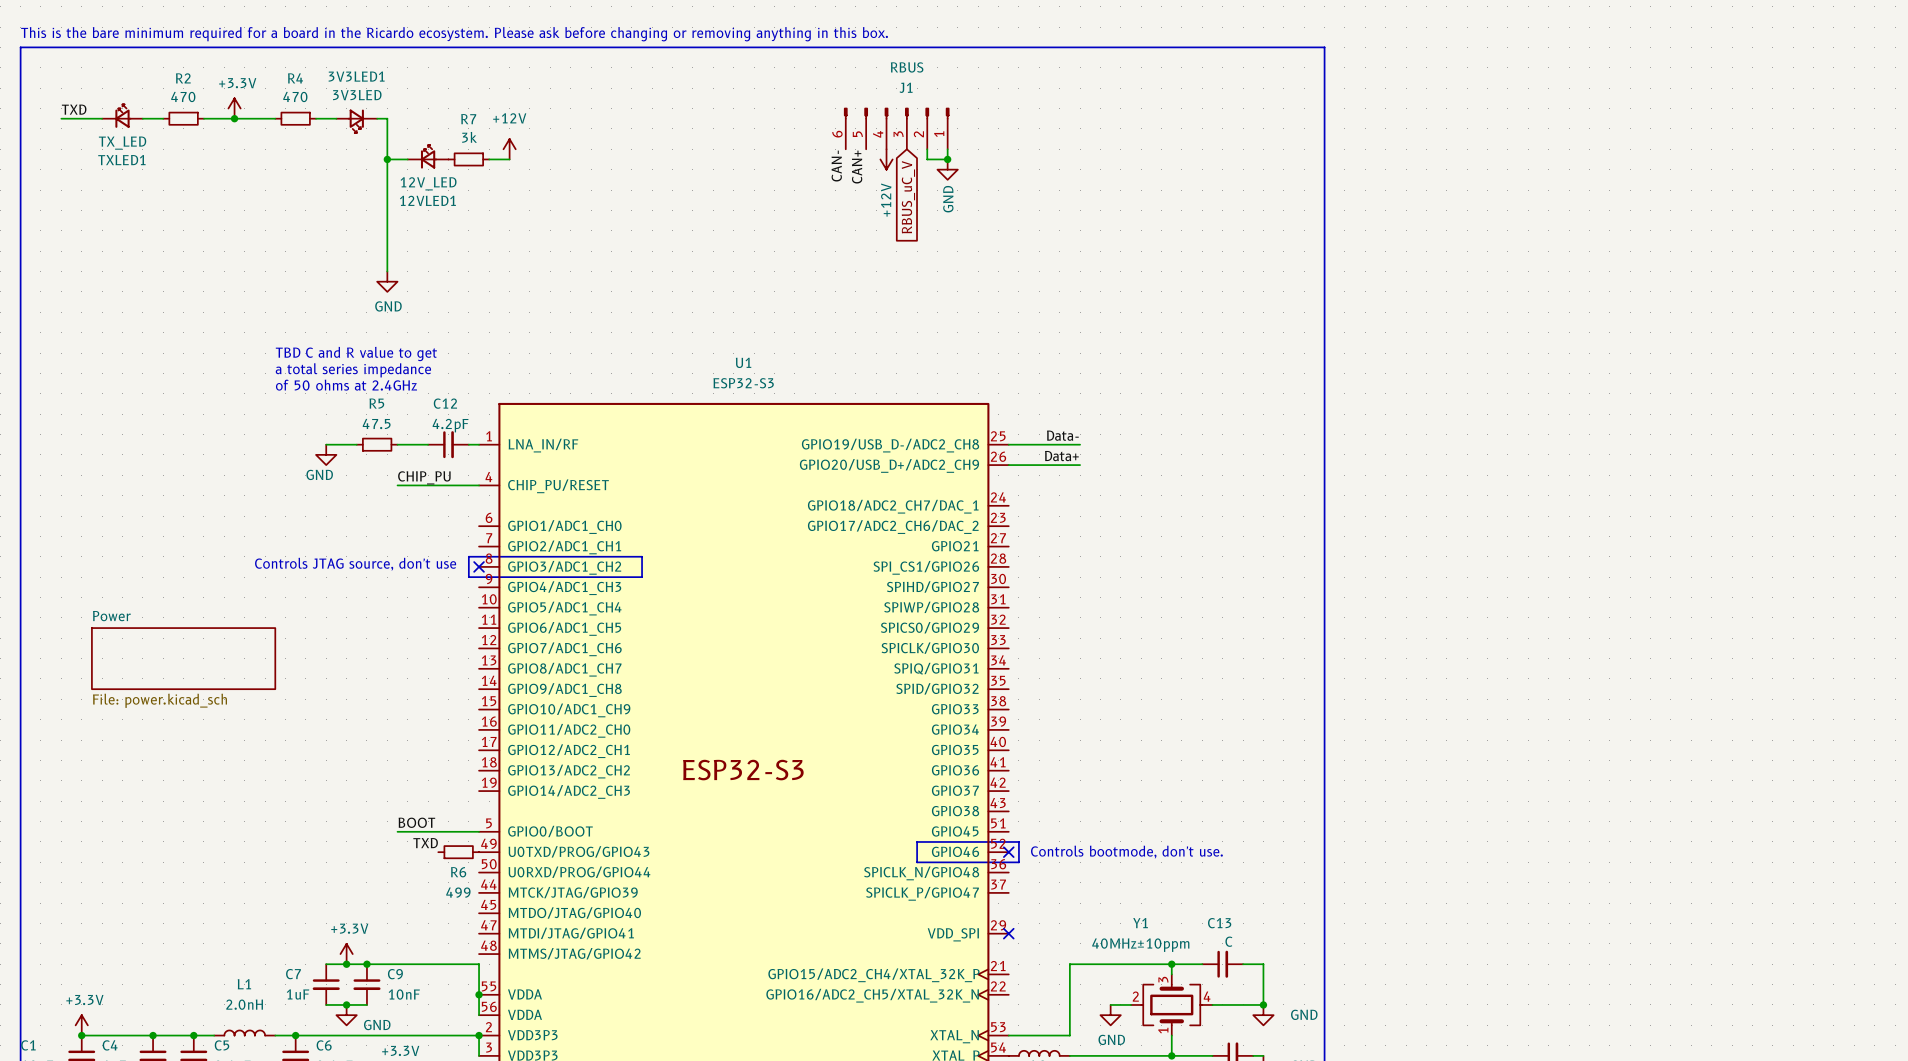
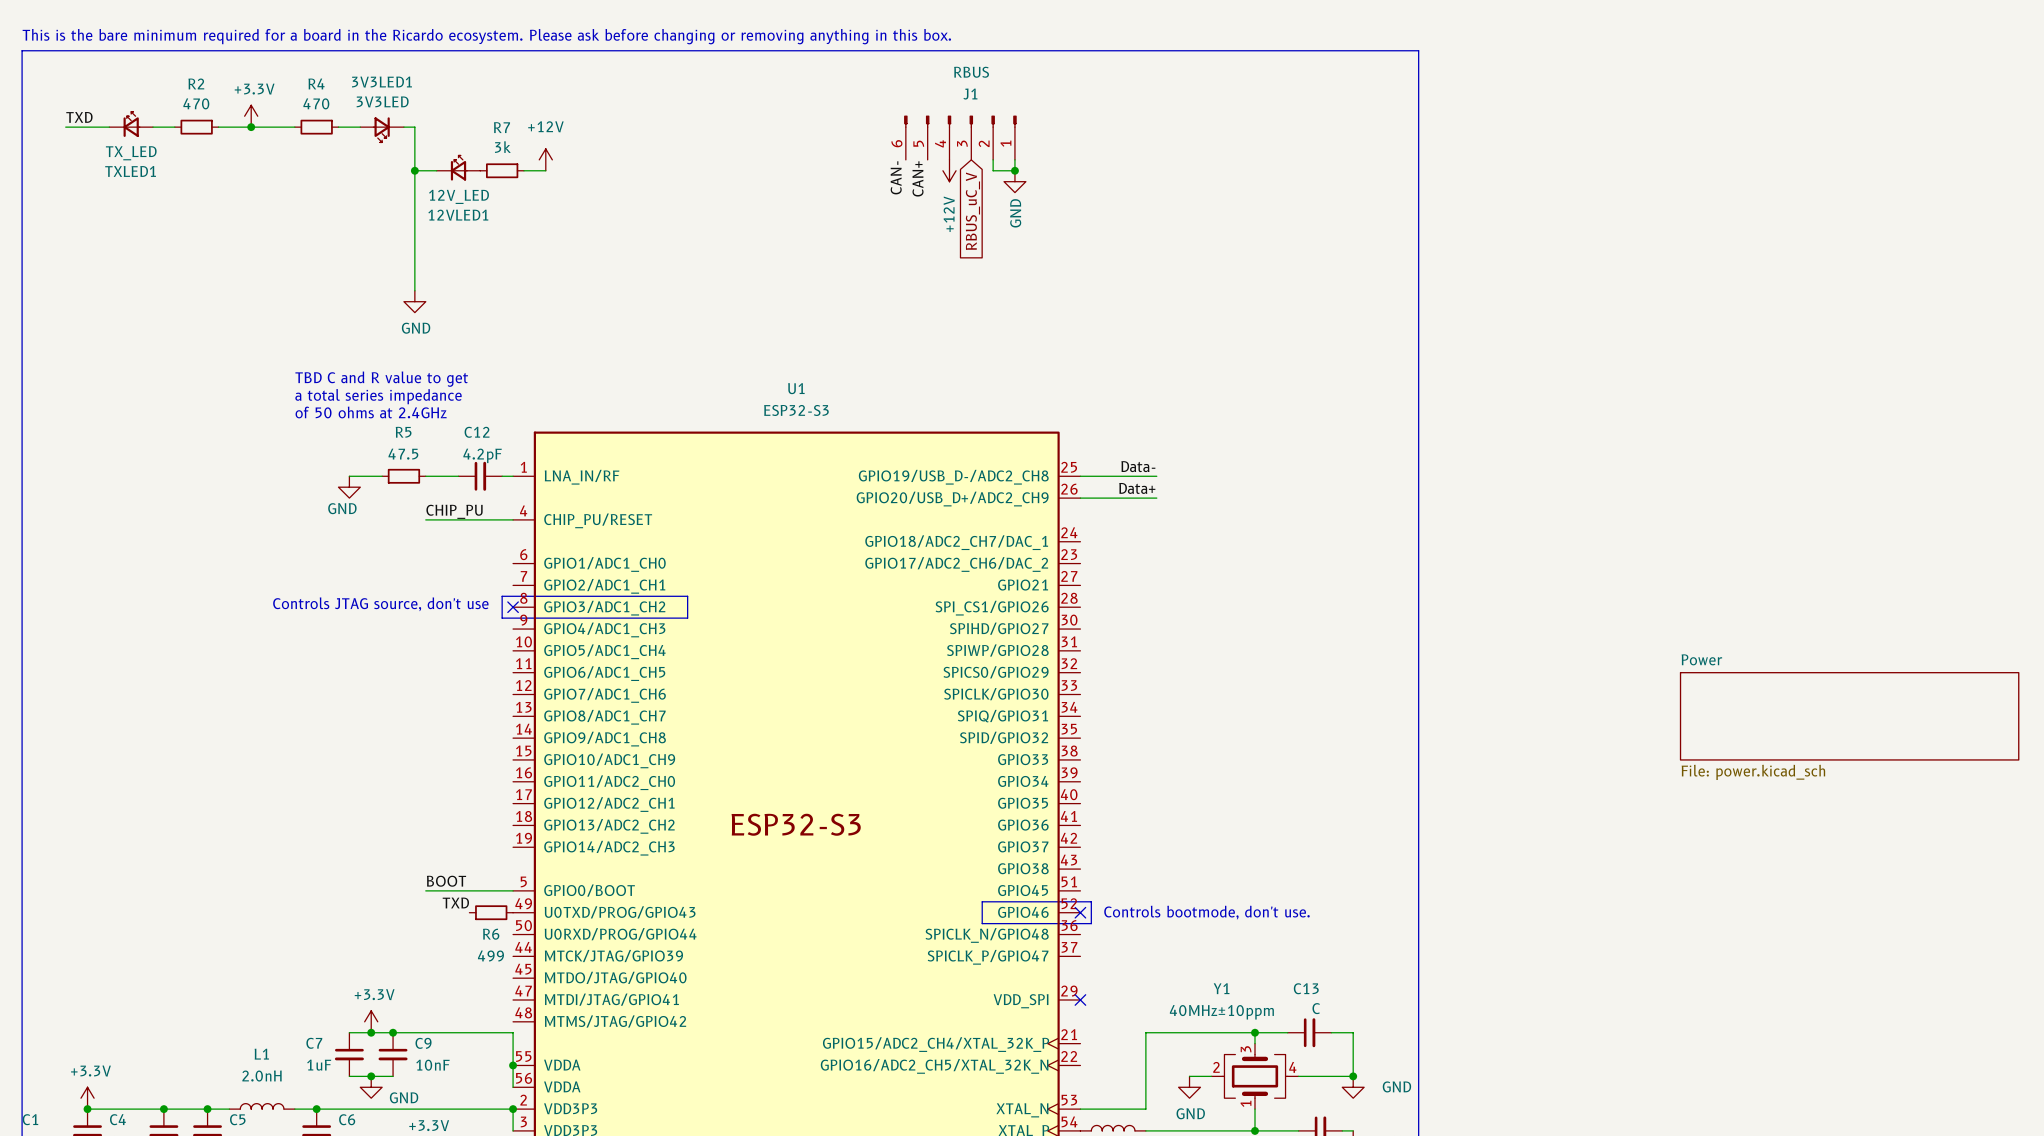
sheet Power: File: power.kicad_sch (183, 658) -> none
sheet Power: none -> File: power.kicad_sch (1849, 716)

